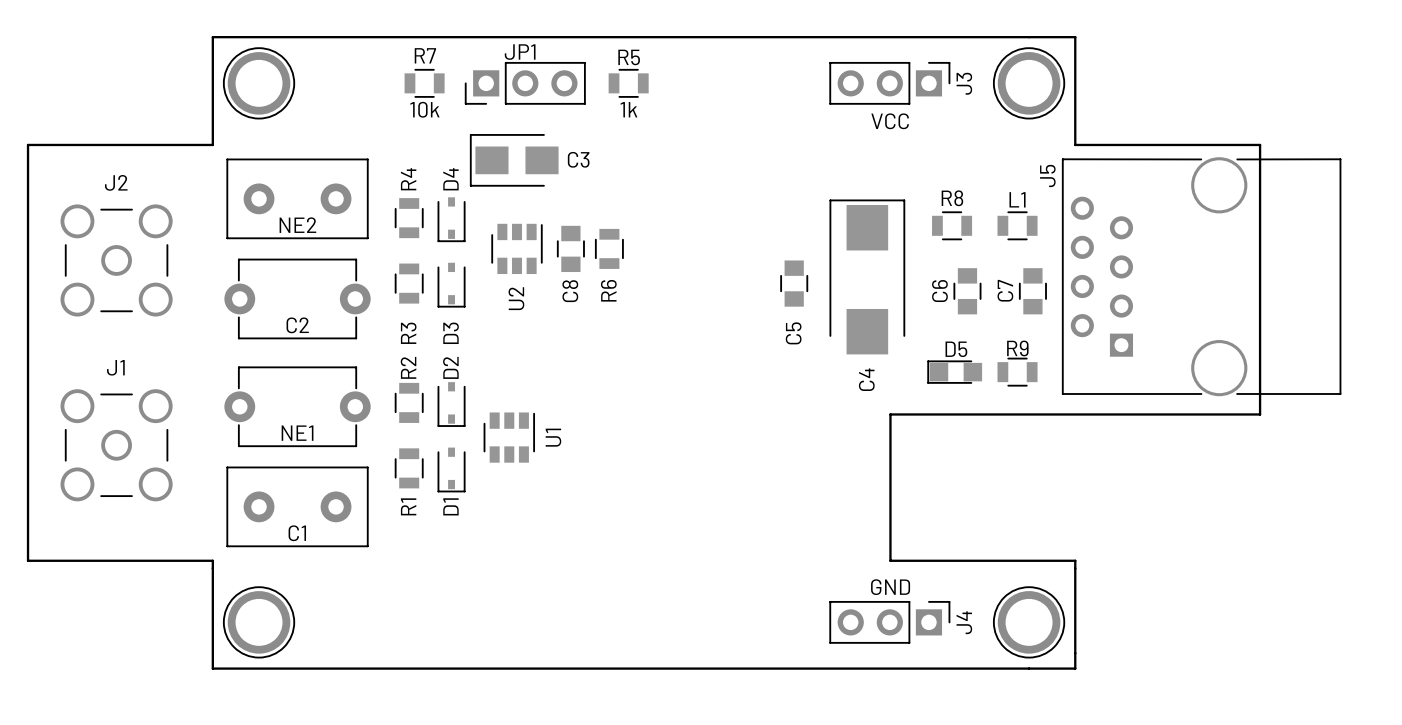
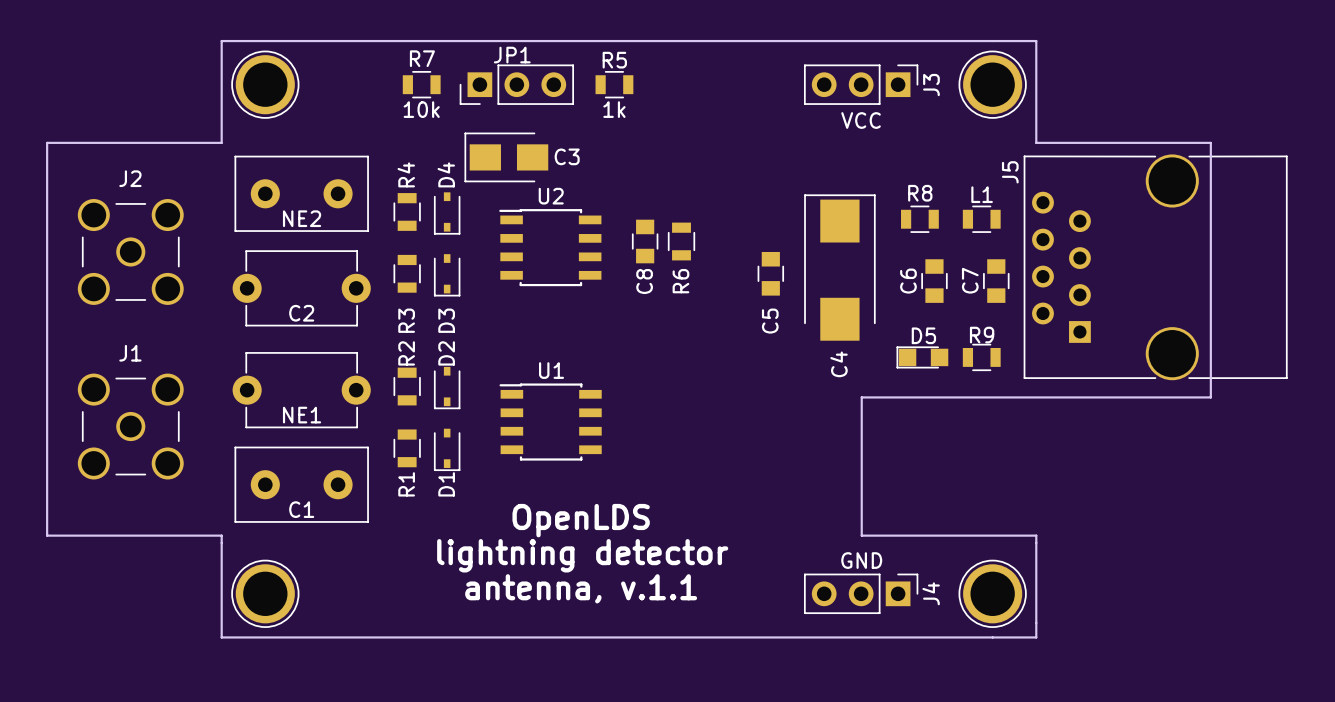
U2 footprint: [491, 223, 543, 275] -> [499, 209, 602, 287]
C8 position: (570, 248) -> (645, 241)
R6 position: (609, 248) -> (681, 241)
U2 name position: U2 (516, 298) -> U2 (551, 196)
U1 footprint: [483, 412, 536, 463] -> [499, 383, 602, 461]
U1 name position: U1 (553, 437) -> U1 (551, 370)
text: none -> OpenLDS (581, 520)
text: none -> lightning detector (582, 555)
text: none -> antenna, v.1.1 (581, 588)

